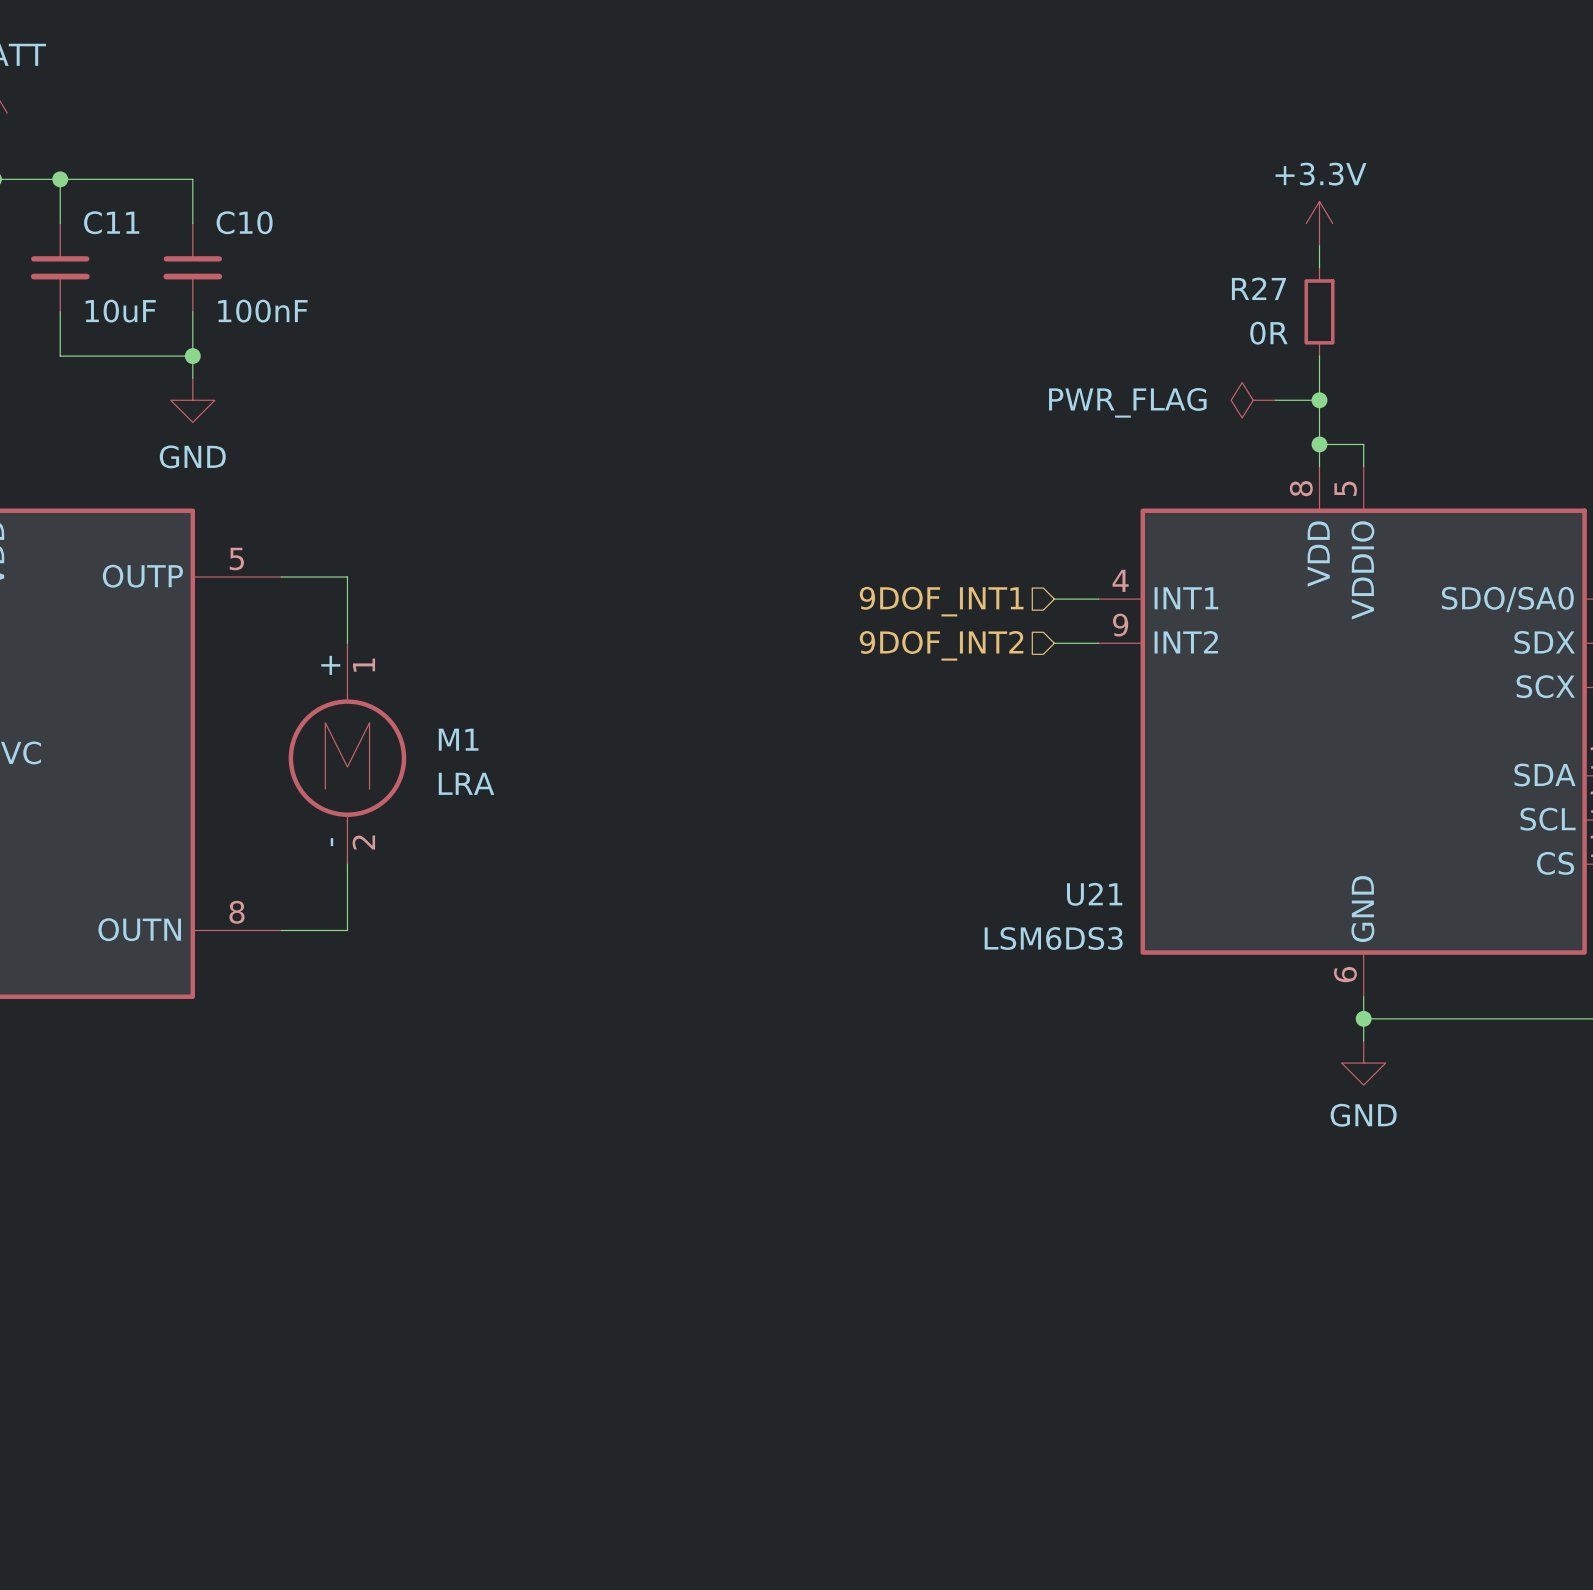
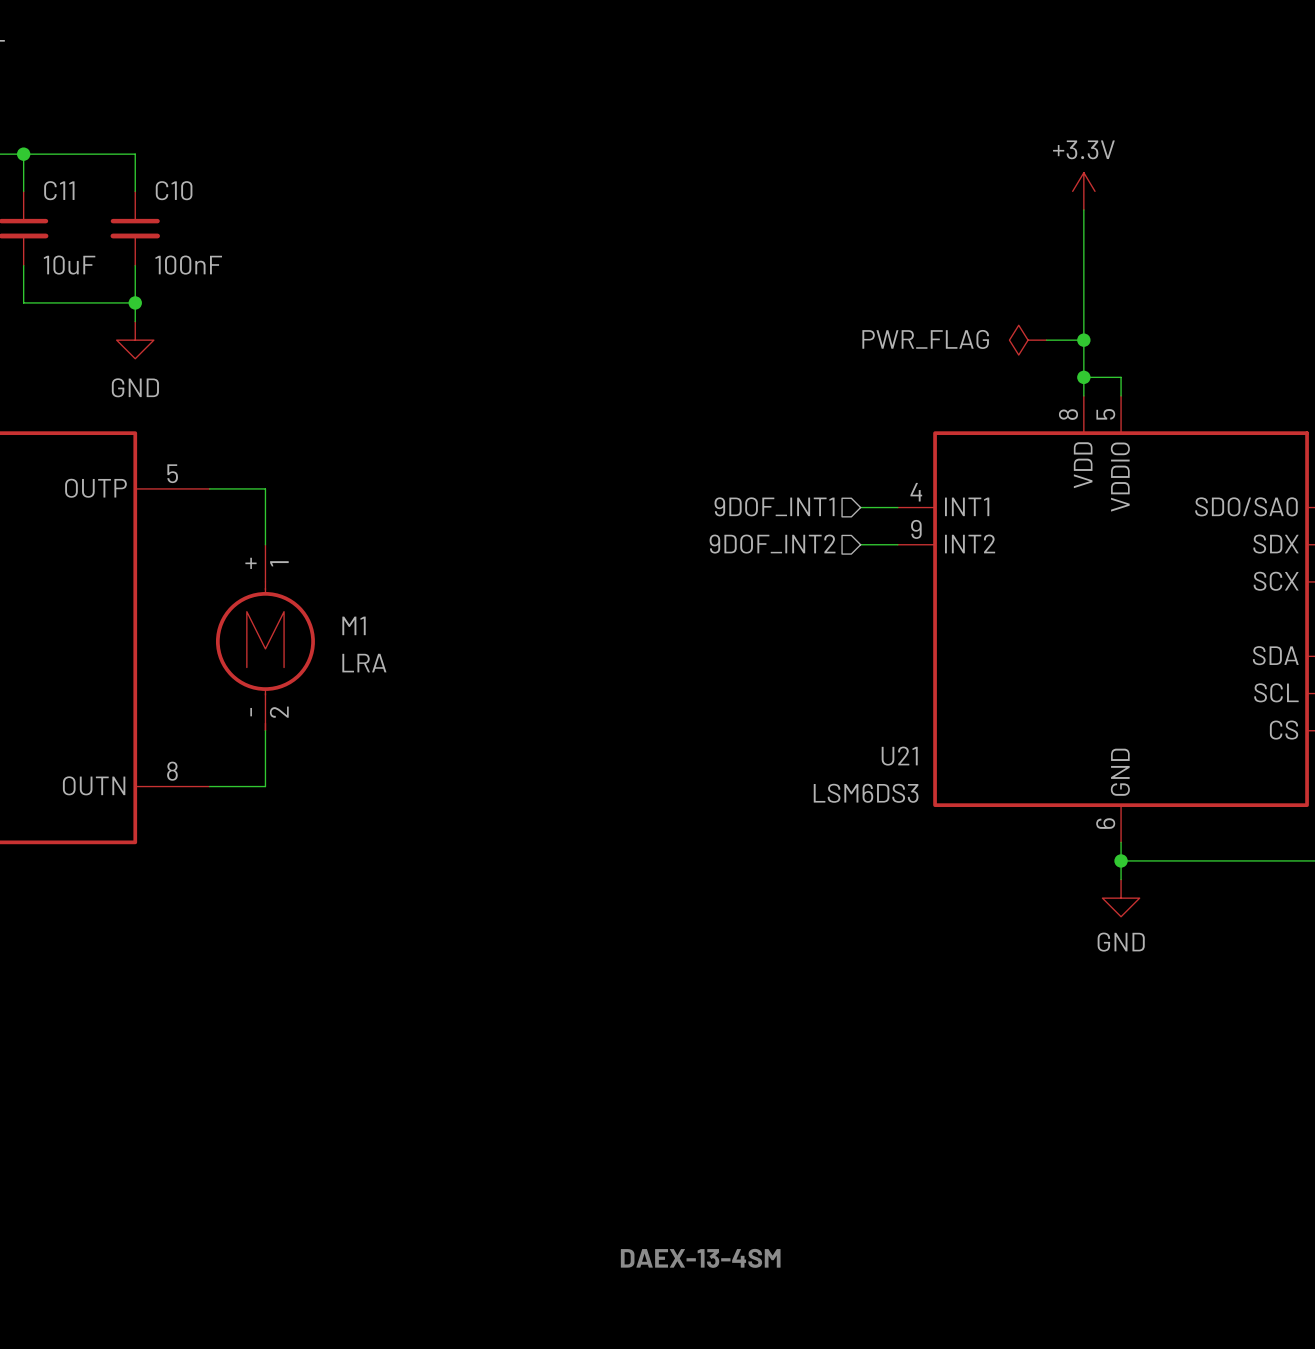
wire: none -> (1083, 228) (1083, 302)
R27: 0R (1319, 311) -> none
text: none -> DAEX-13-4SM (700, 1258)

